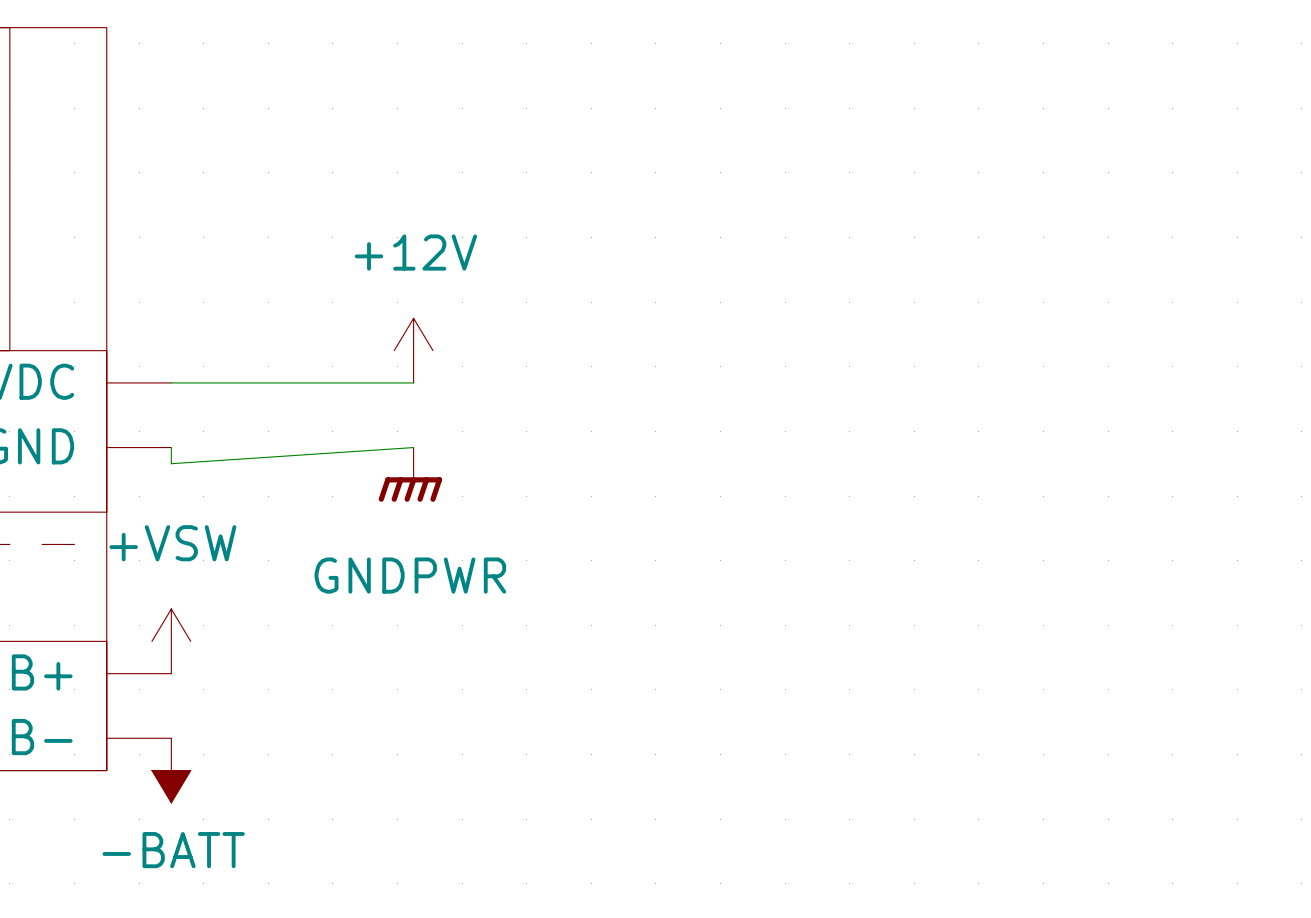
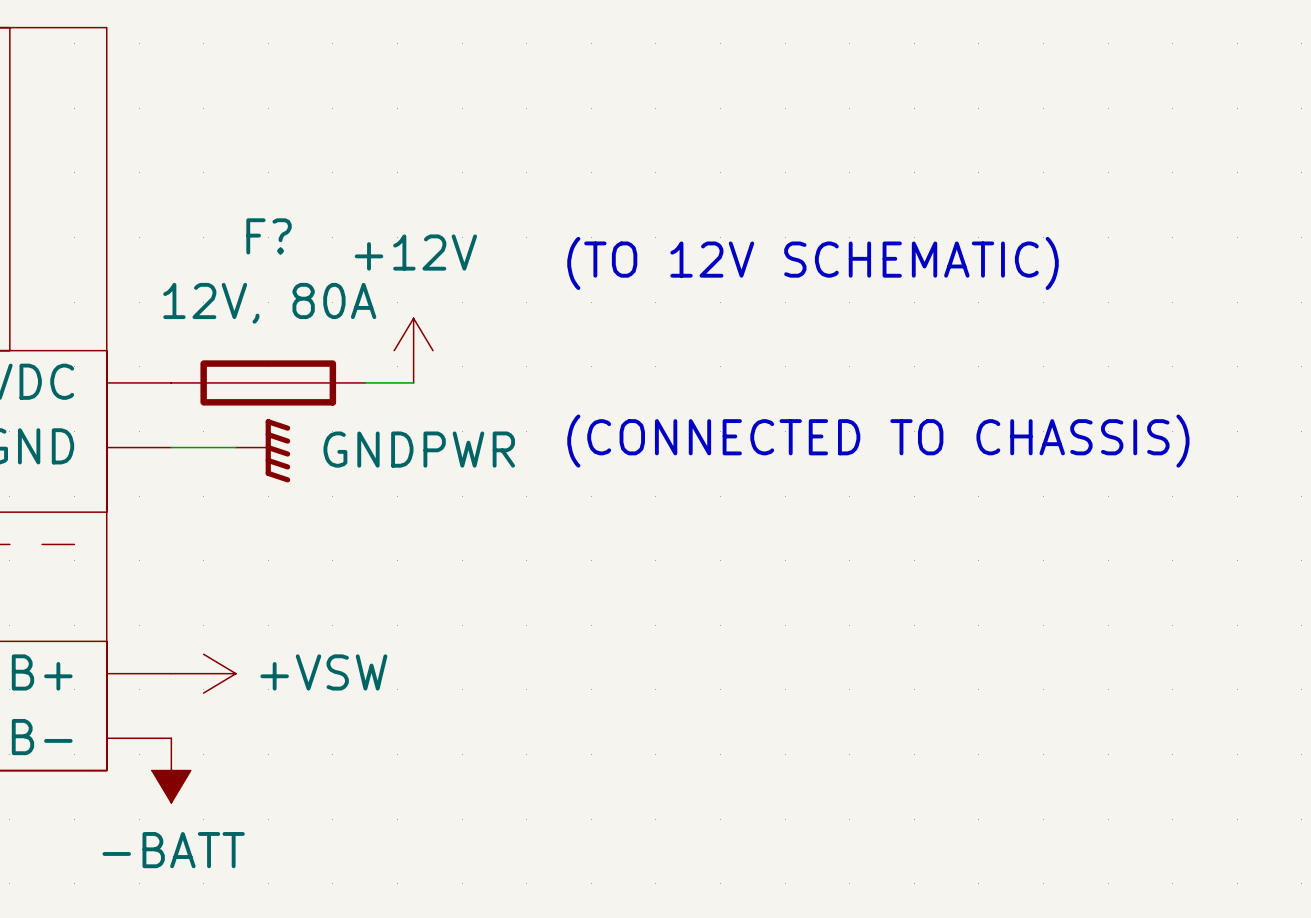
text: none -> (TO 12V SCHEMATIC) (813, 263)
F?: none -> 12V, 80A (268, 382)
text: none -> (CONNECTED TO CHASSIS) (878, 441)
wire: (171, 447) (171, 463) (413, 447) -> (171, 447) (235, 447)
power symbol rotation: 0° (410, 474) -> 90° counterclockwise (263, 450)
power symbol position: GNDPWR (410, 474) -> GNDPWR (263, 450)
power symbol text position: GNDPWR (410, 575) -> GNDPWR (419, 449)
power symbol rotation: 0° (171, 641) -> 90° clockwise (203, 673)
power symbol position: +VSW (171, 641) -> +VSW (203, 673)

